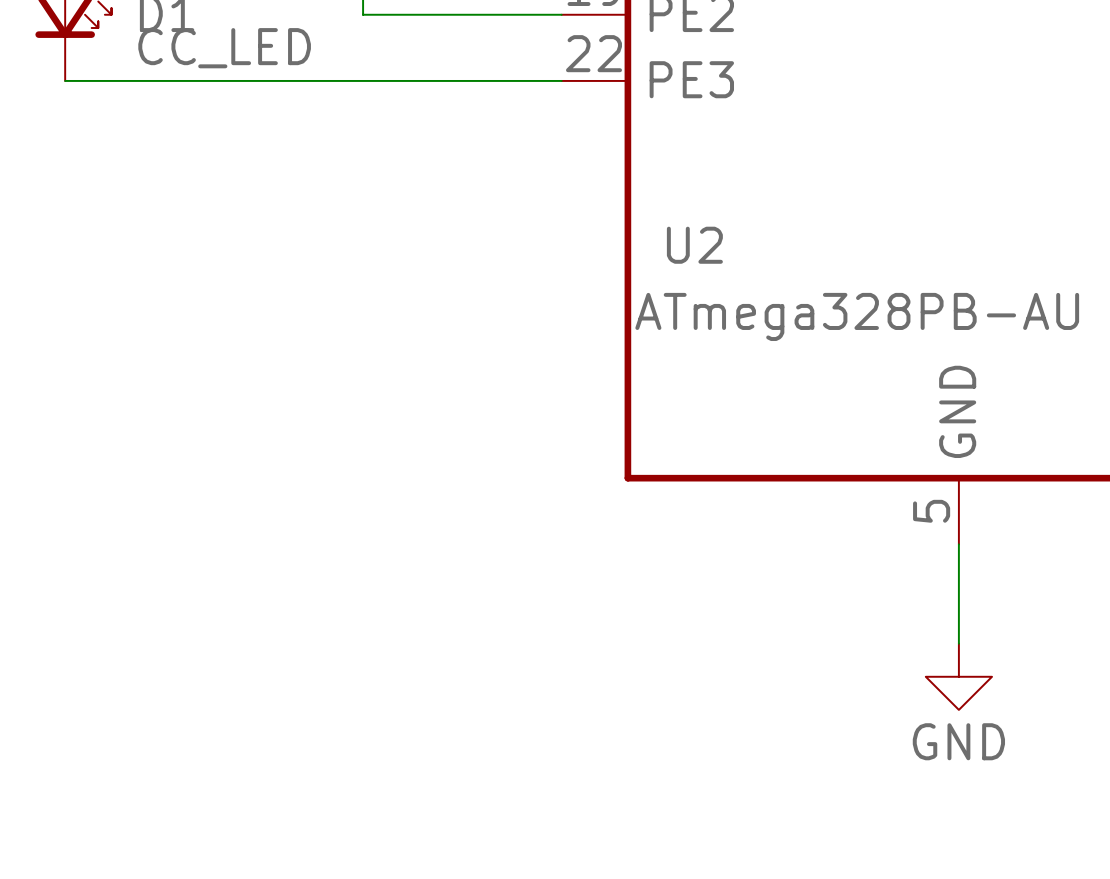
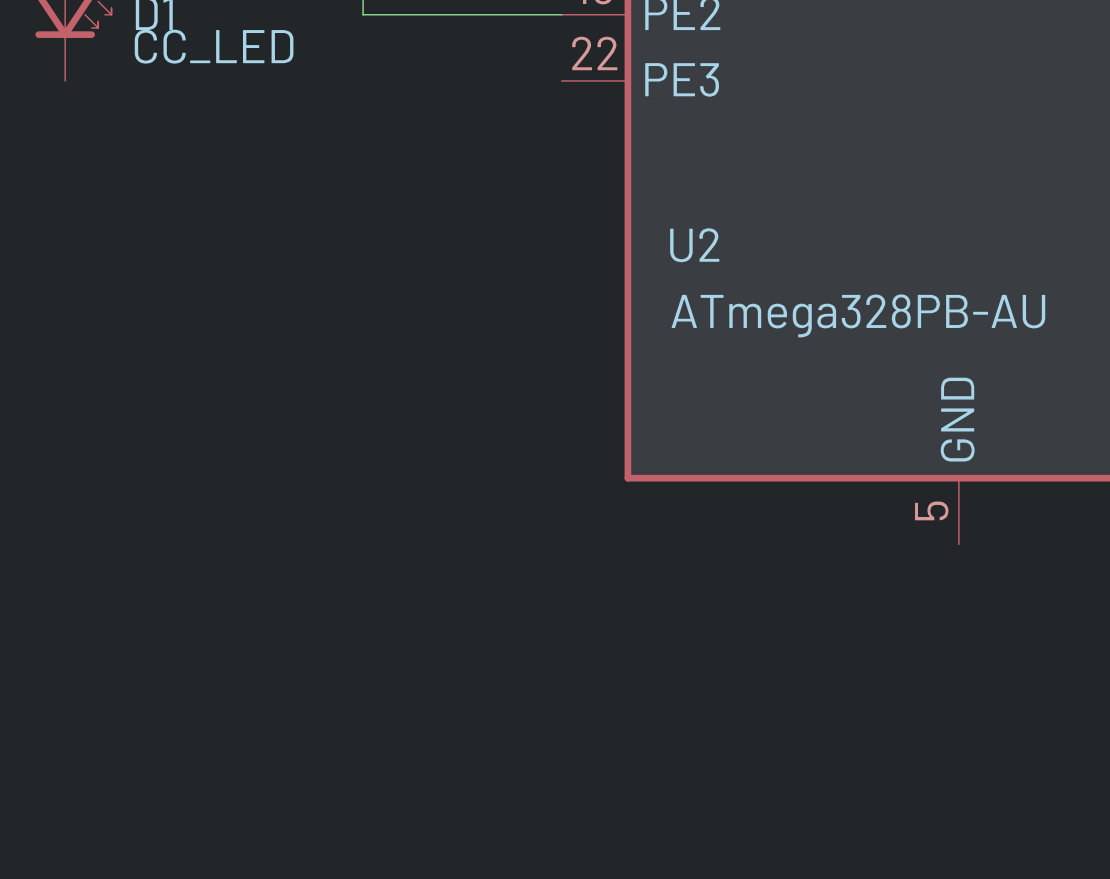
wire: (65, 80) (561, 80) -> none
wire: (958, 544) (958, 643) -> none
power symbol: GND (958, 676) -> none

